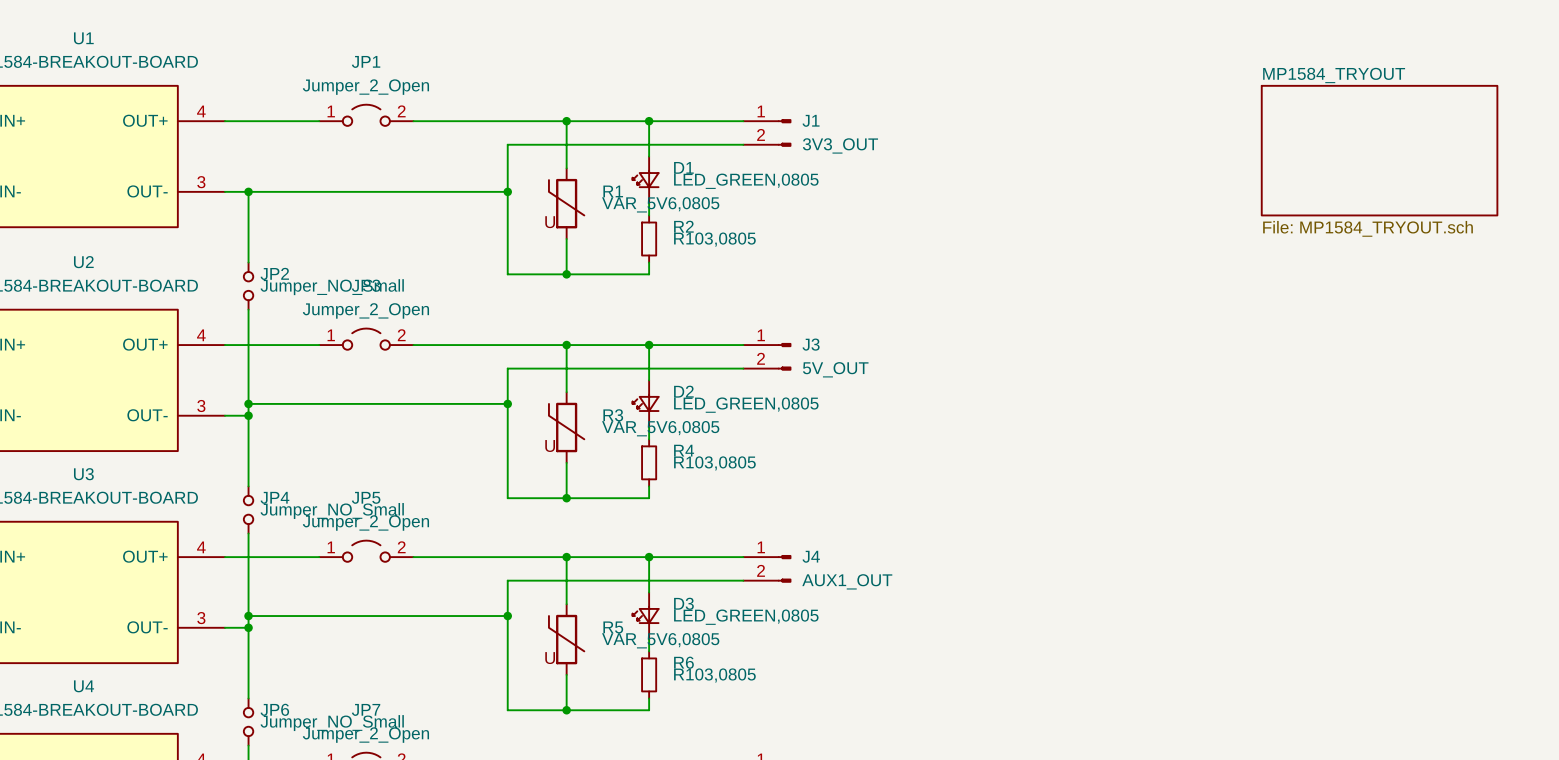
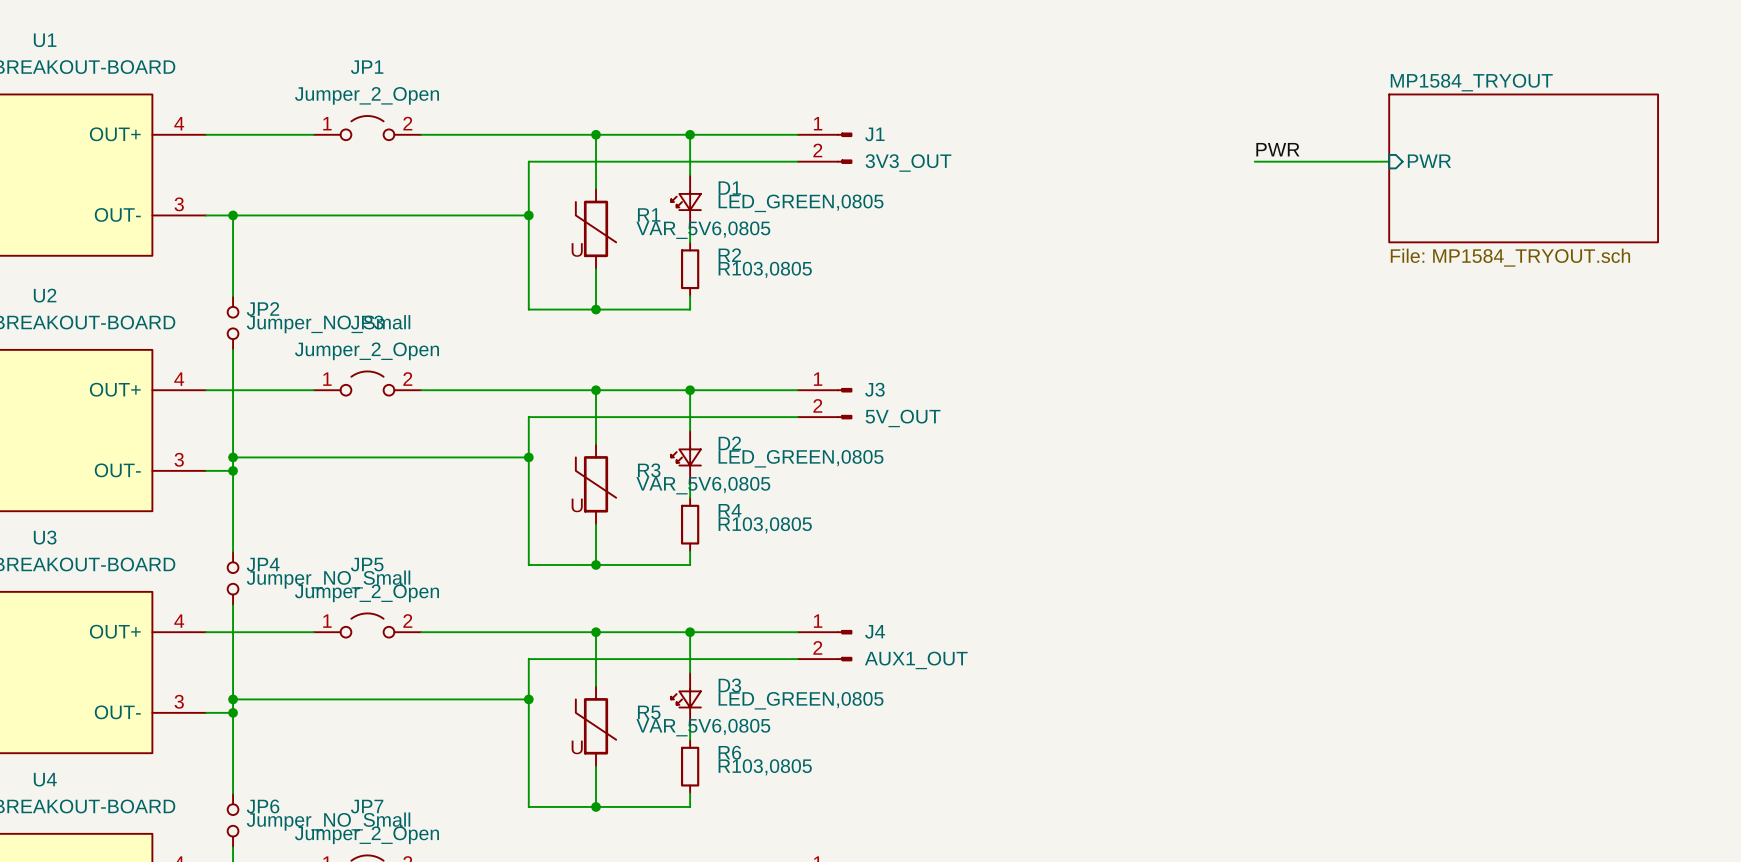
label: none -> PWR (1277, 149)
wire: none -> (1254, 161) (1389, 161)
sheet pin: none -> PWR (1429, 161)

